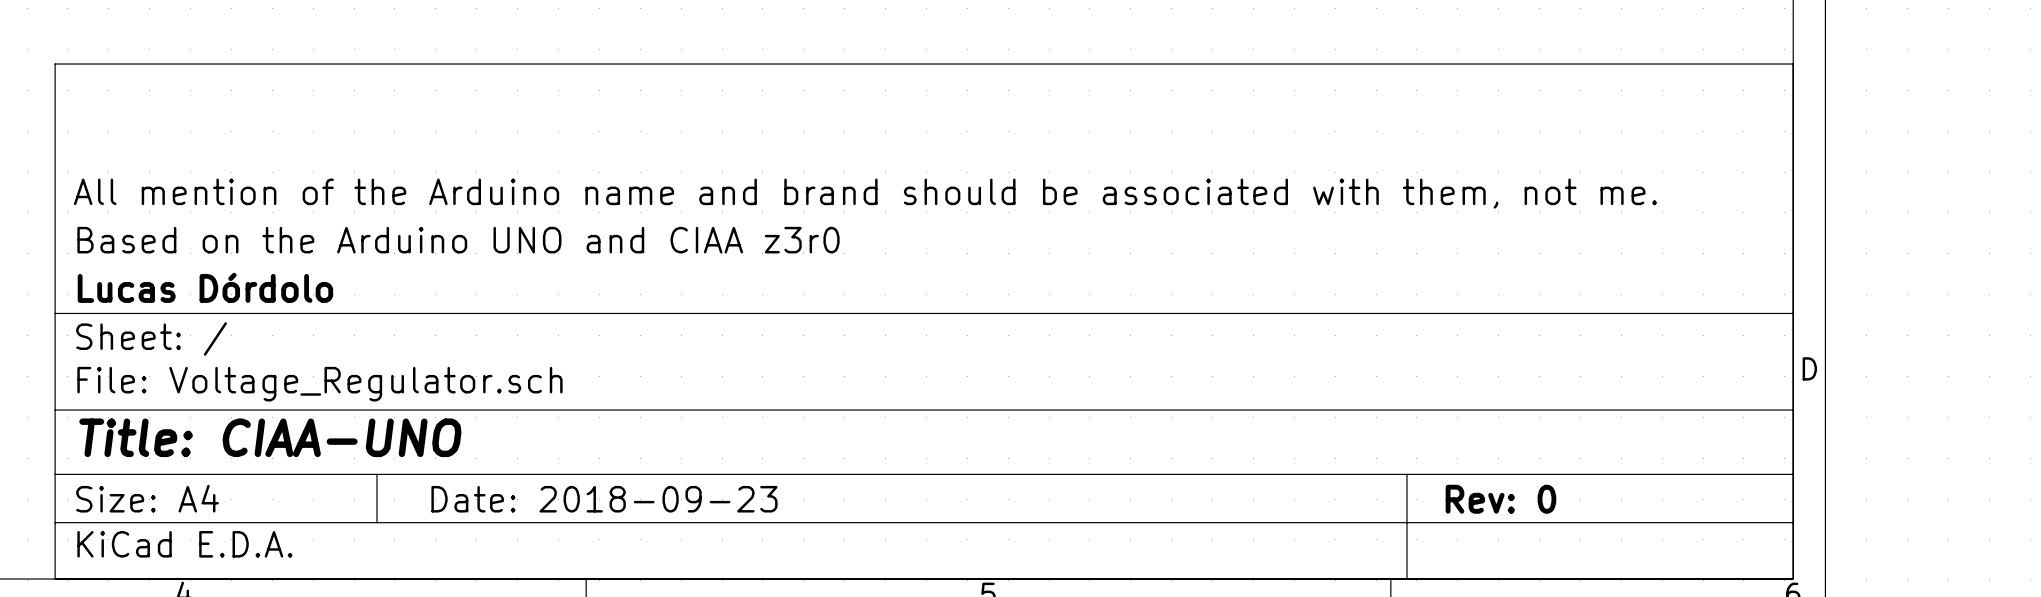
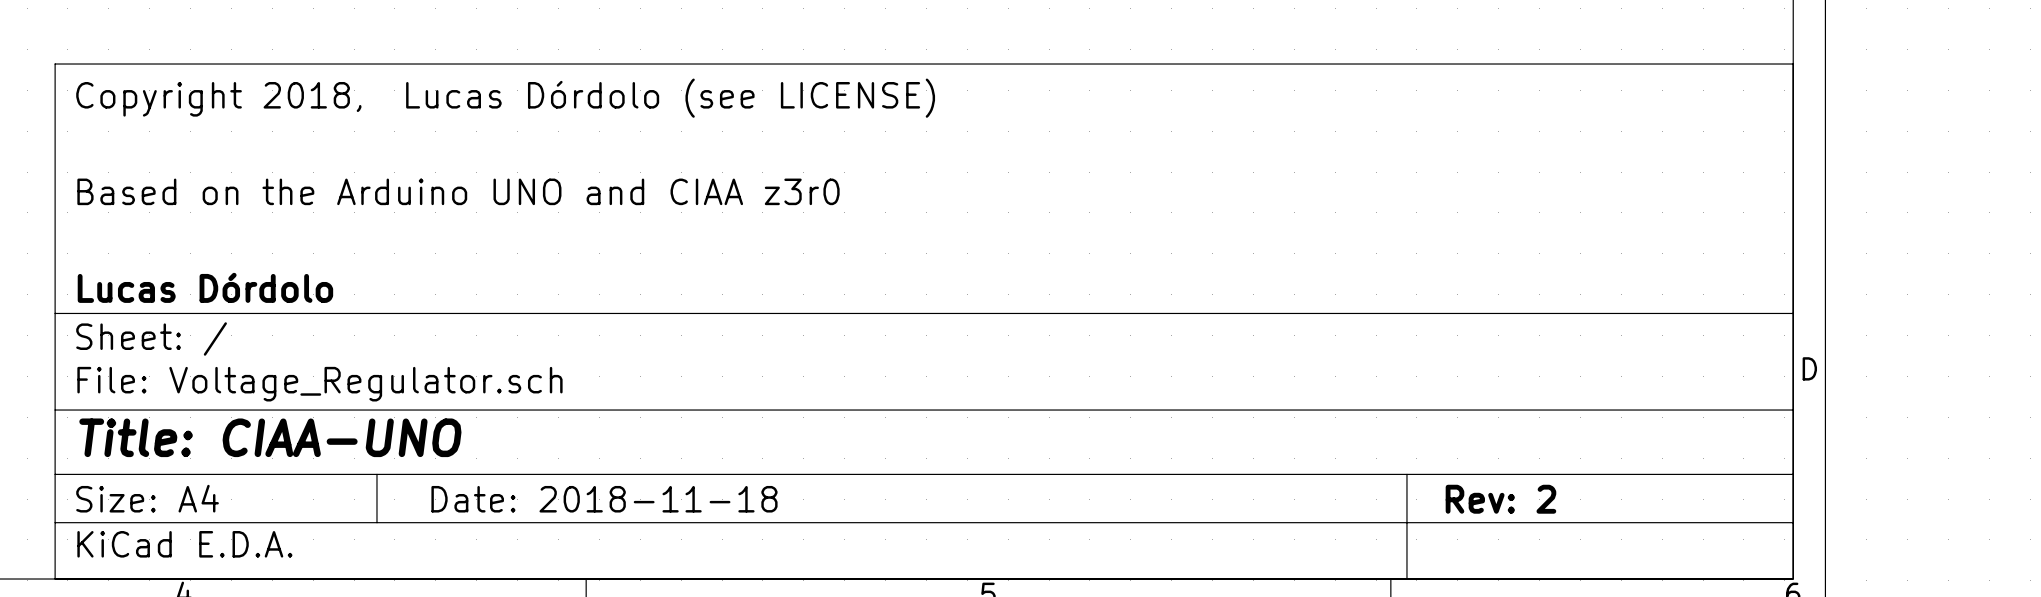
title block: none -> Copyright 2018, Lucas Dórdolo (see LICENSE) (505, 98)
title block: All mention of the Arduino name and brand should be associated with them, not me. (865, 193) -> Based on the Arduino UNO and CIAA z3r0 (458, 191)
title block: Based on the Arduino UNO and CIAA z3r0 (458, 240) -> none
title block: Date: 2018-09-23 (604, 499) -> Date: 2018-11-18 (604, 499)
title block: Rev: 0 (1500, 499) -> Rev: 2 (1500, 499)

